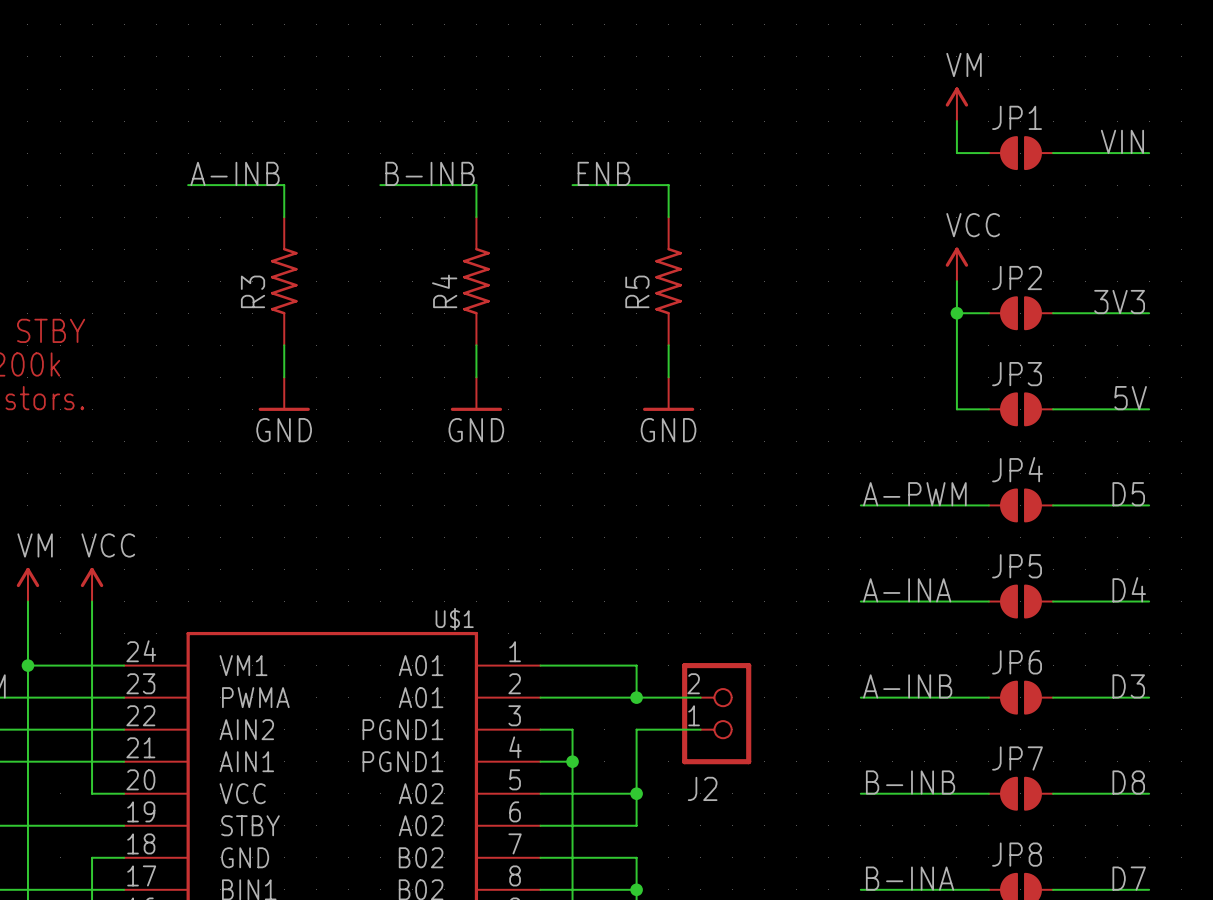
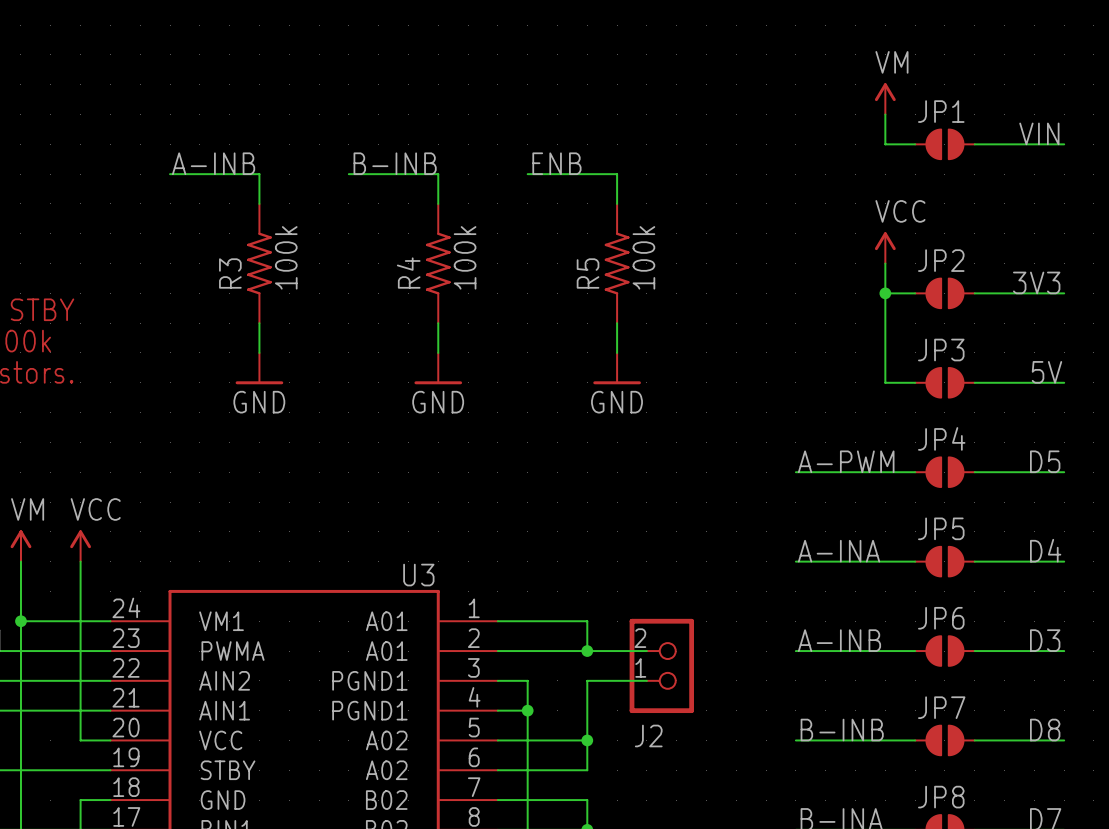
R3 value: none -> 100k (286, 257)
R4 value: none -> 100k (465, 257)
R5 value: none -> 100k (643, 257)
U$1 name: U$1 (454, 619) -> U3 (418, 575)

